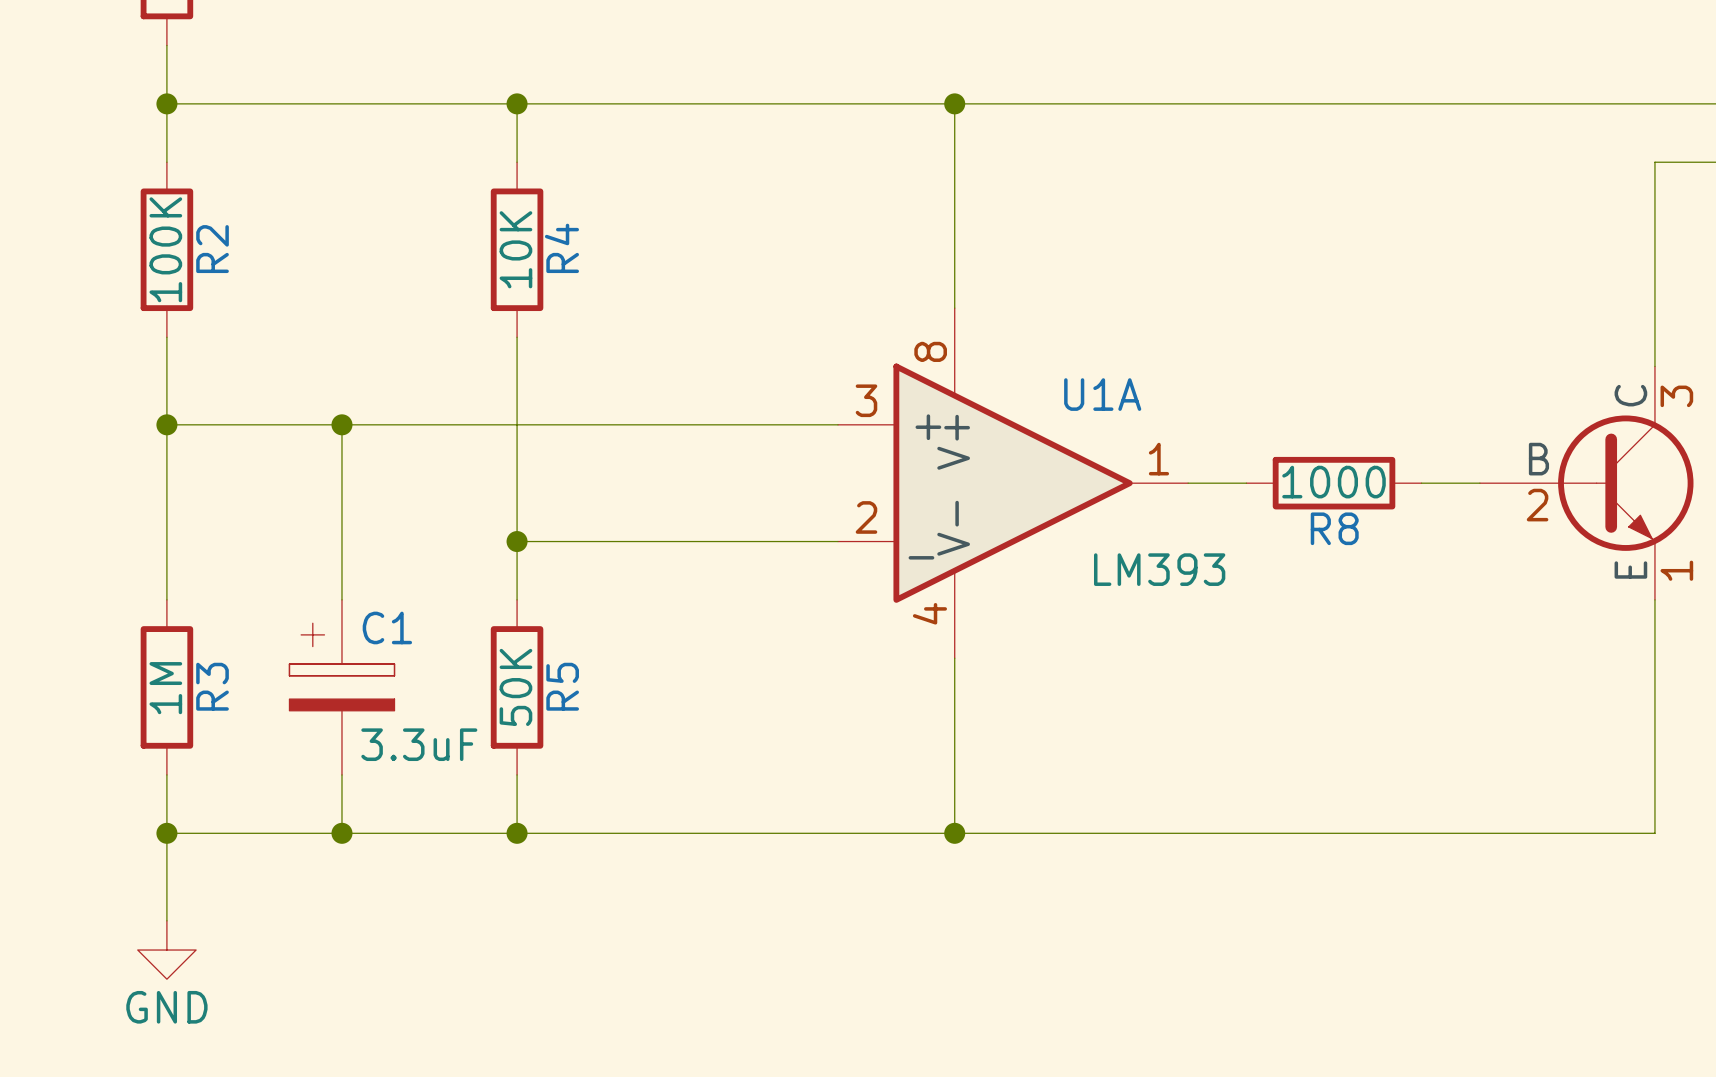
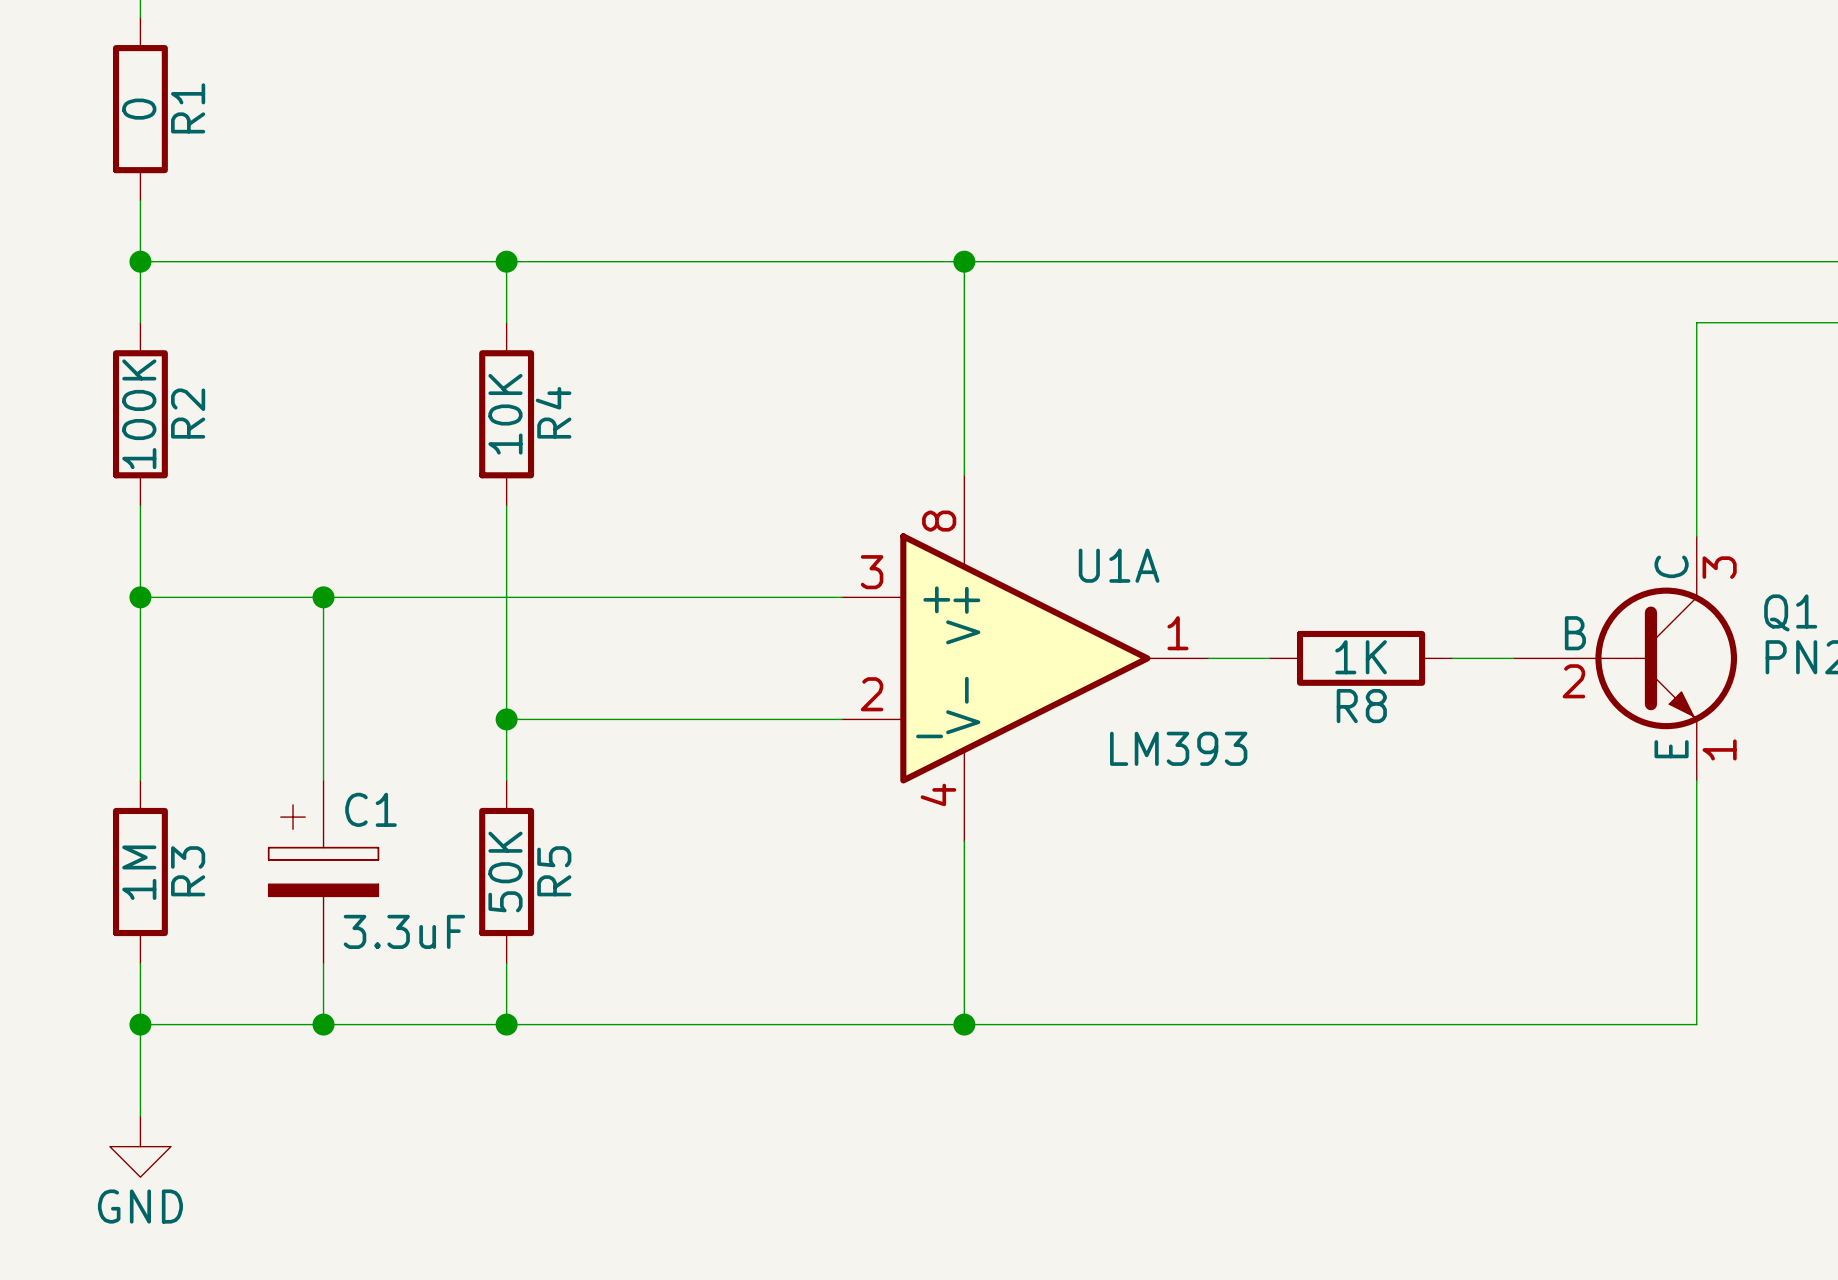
R8 value: 1000 (1334, 482) -> 1K (1361, 657)

